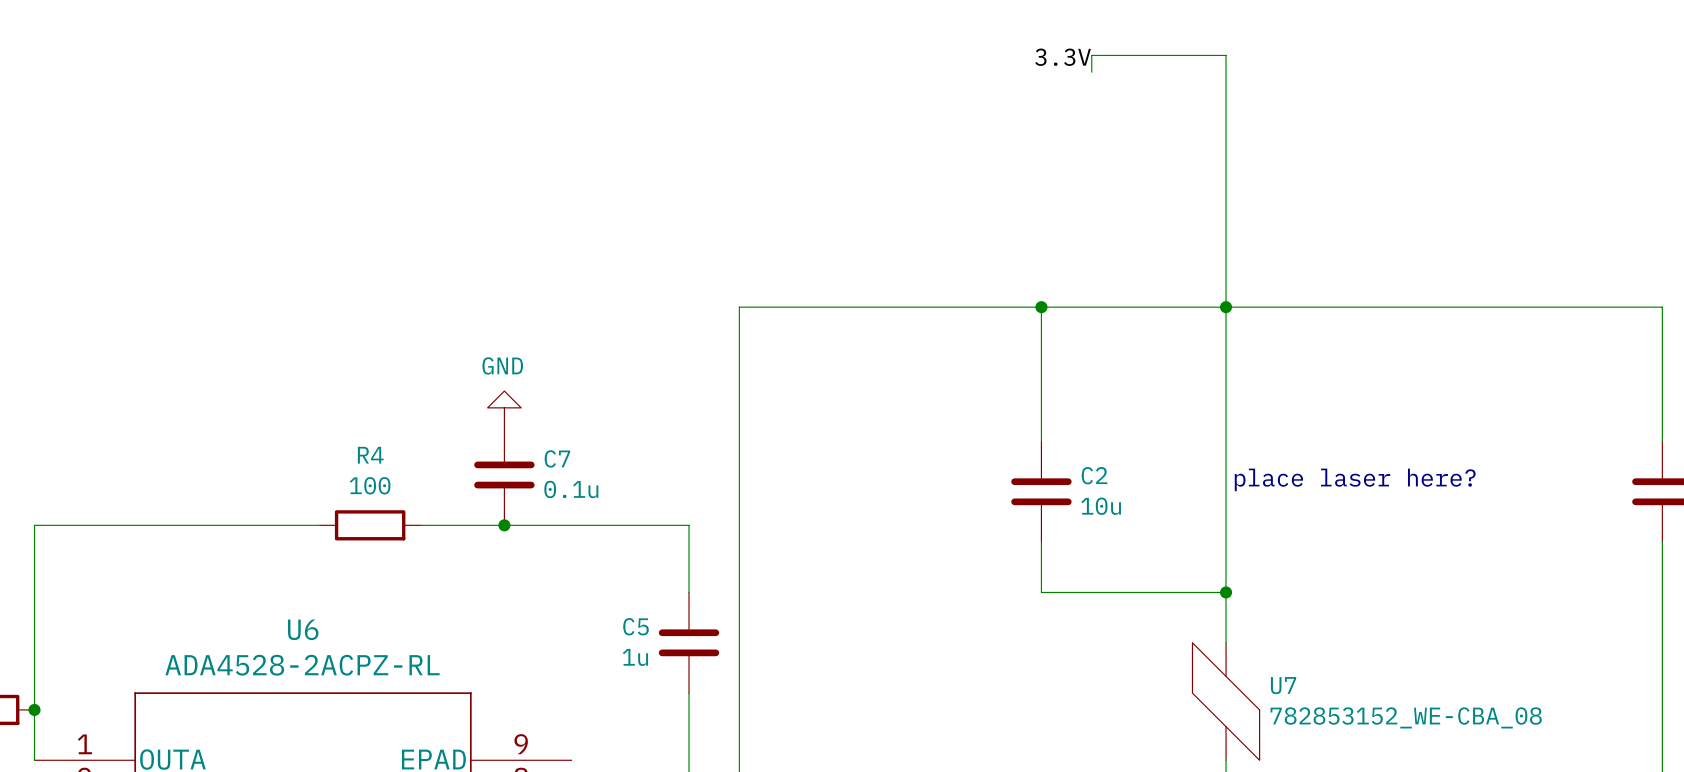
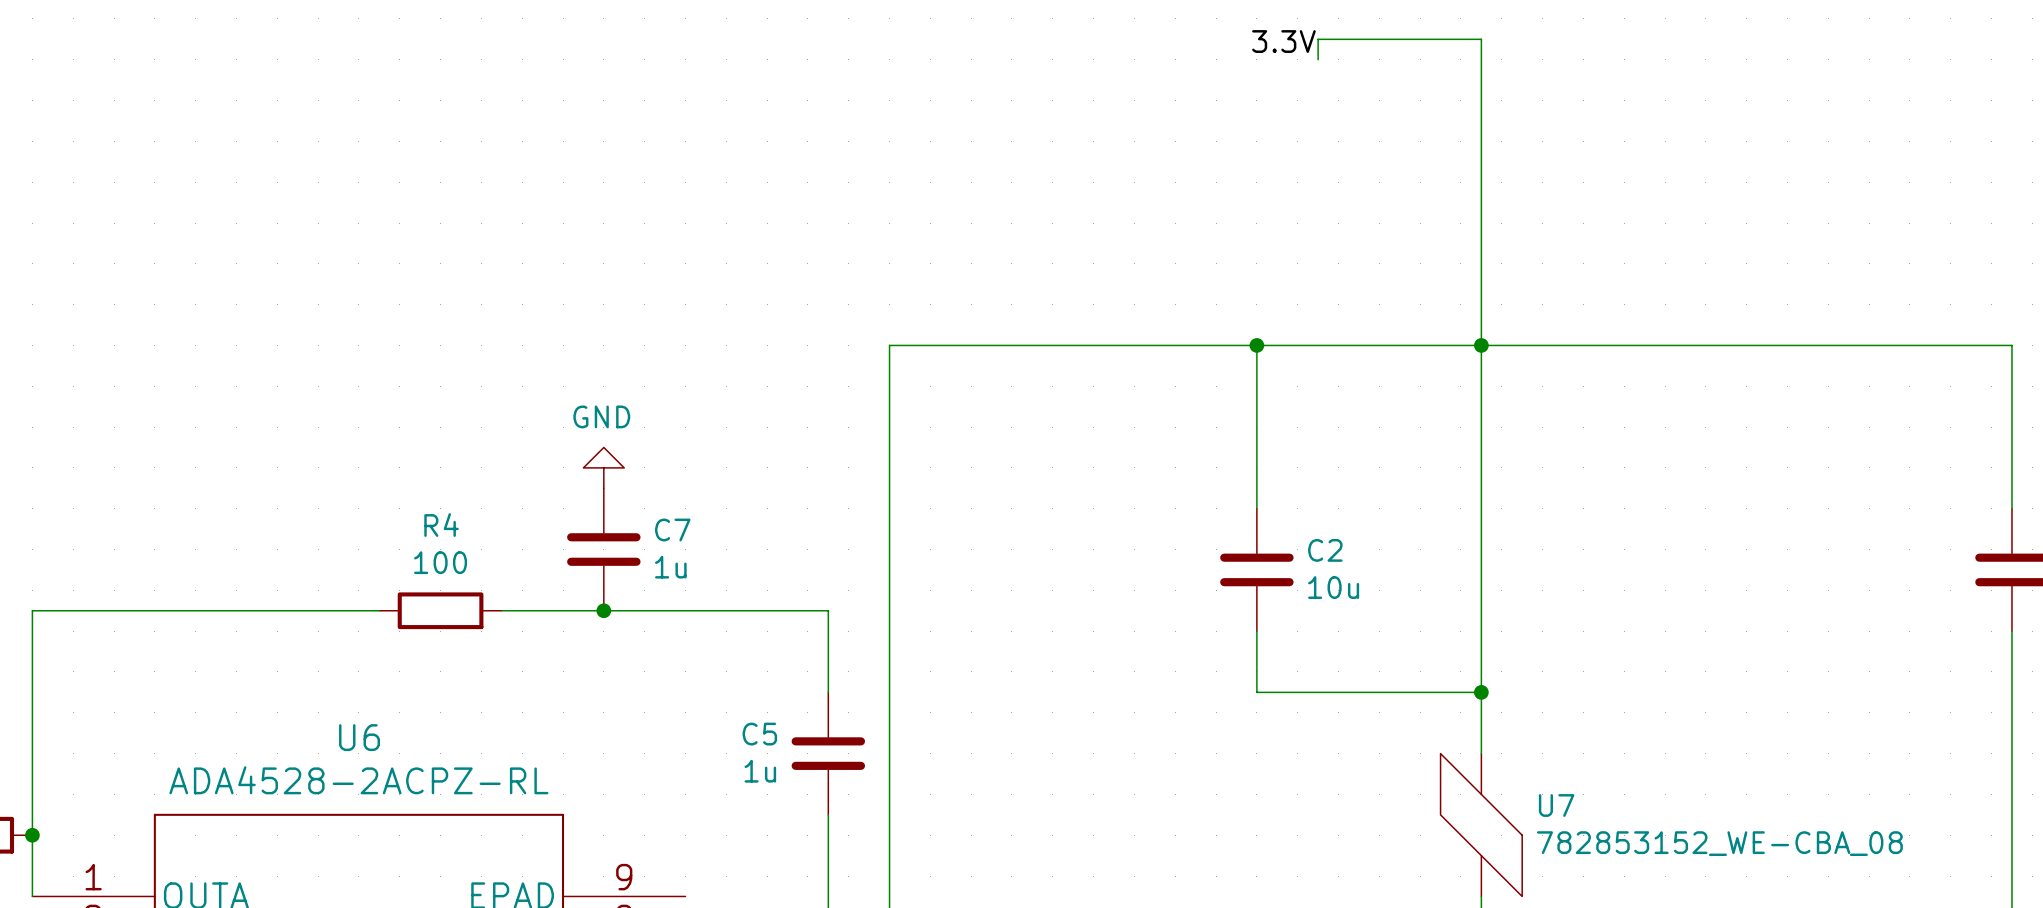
text: place laser here? (1355, 479) -> none
C7 value: 0.1u (571, 489) -> 1u (670, 567)

